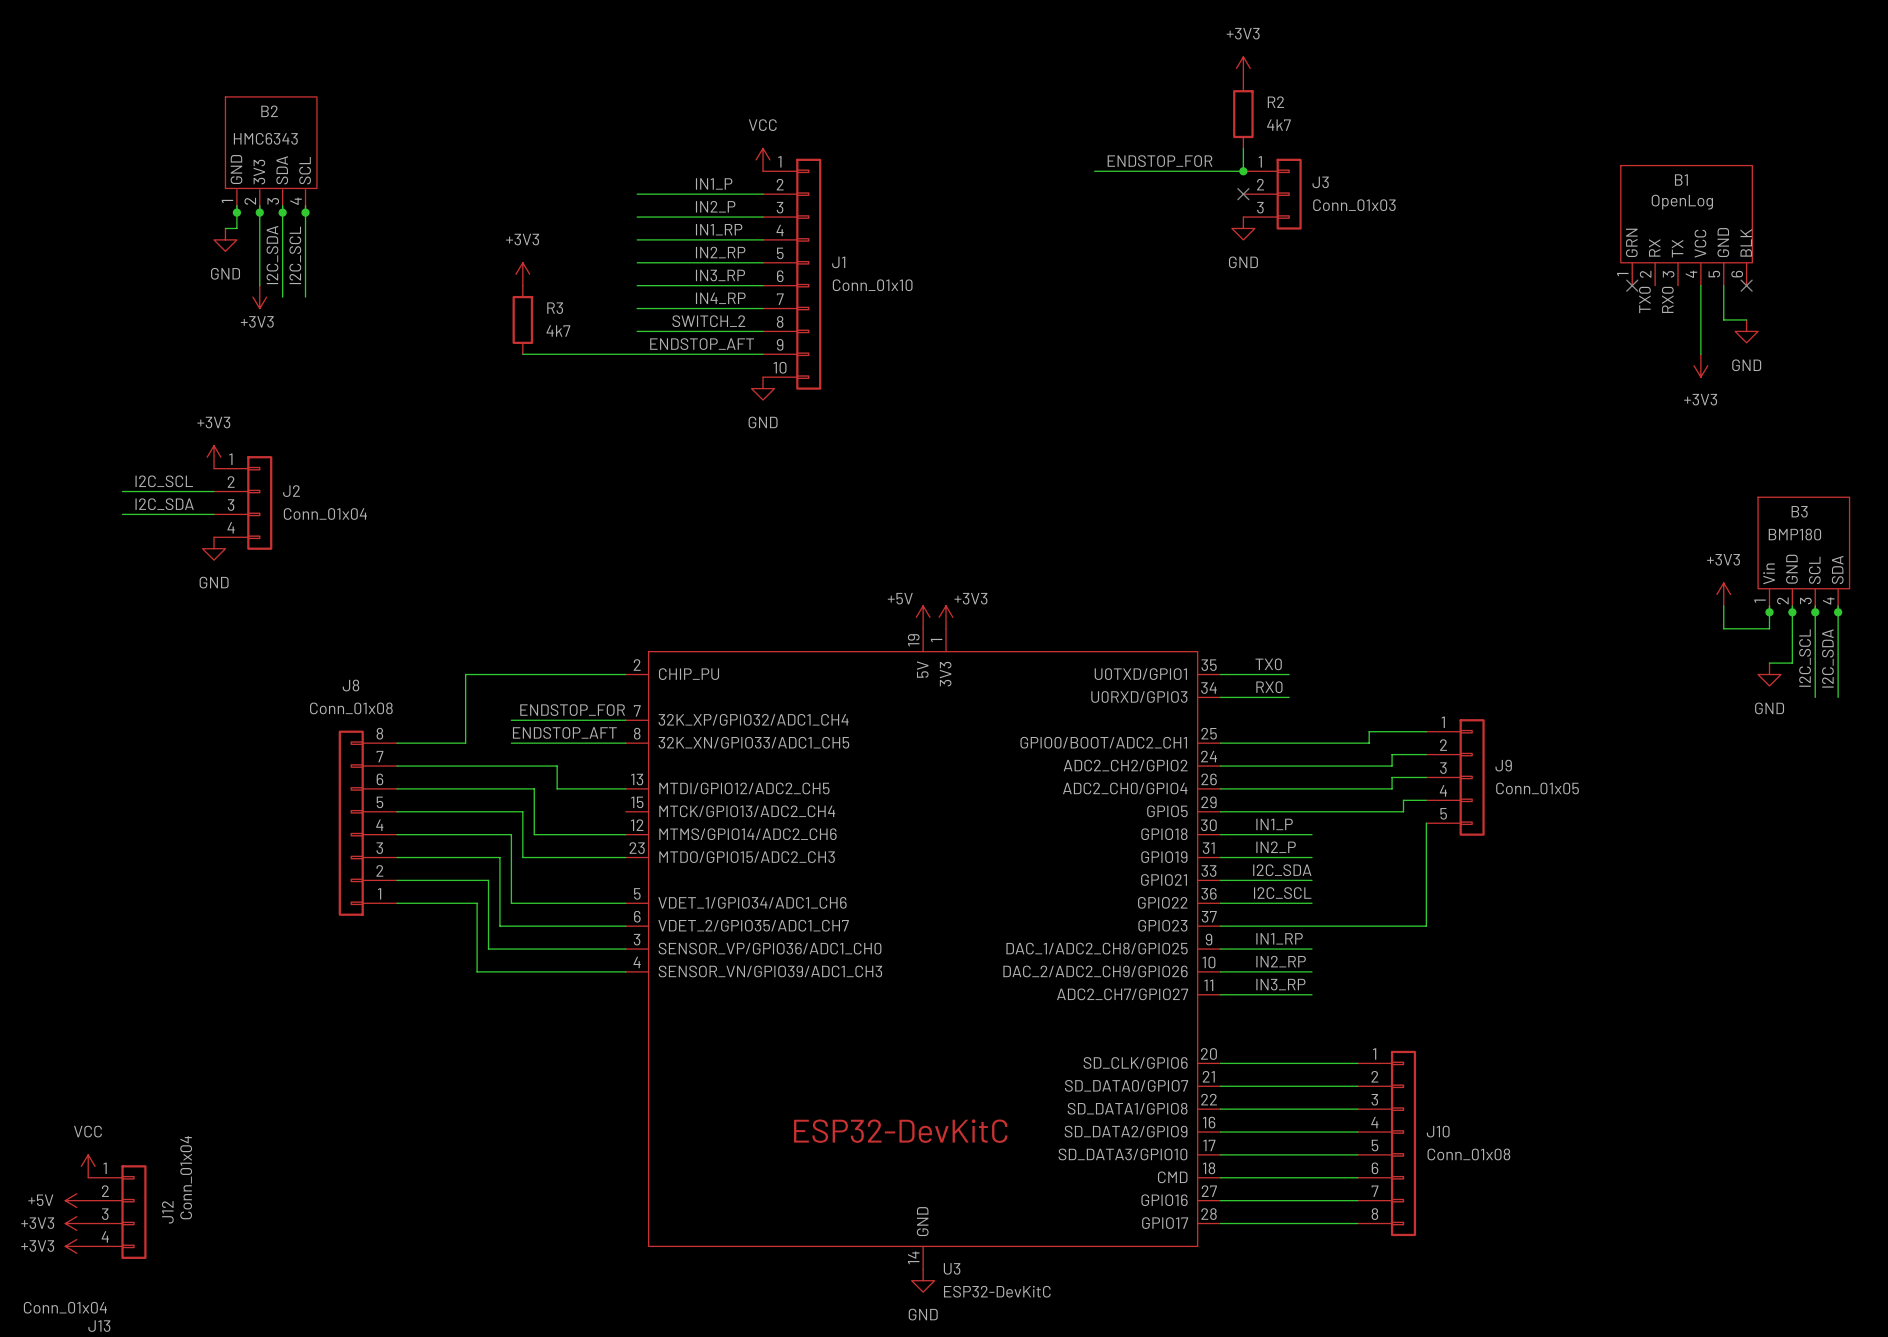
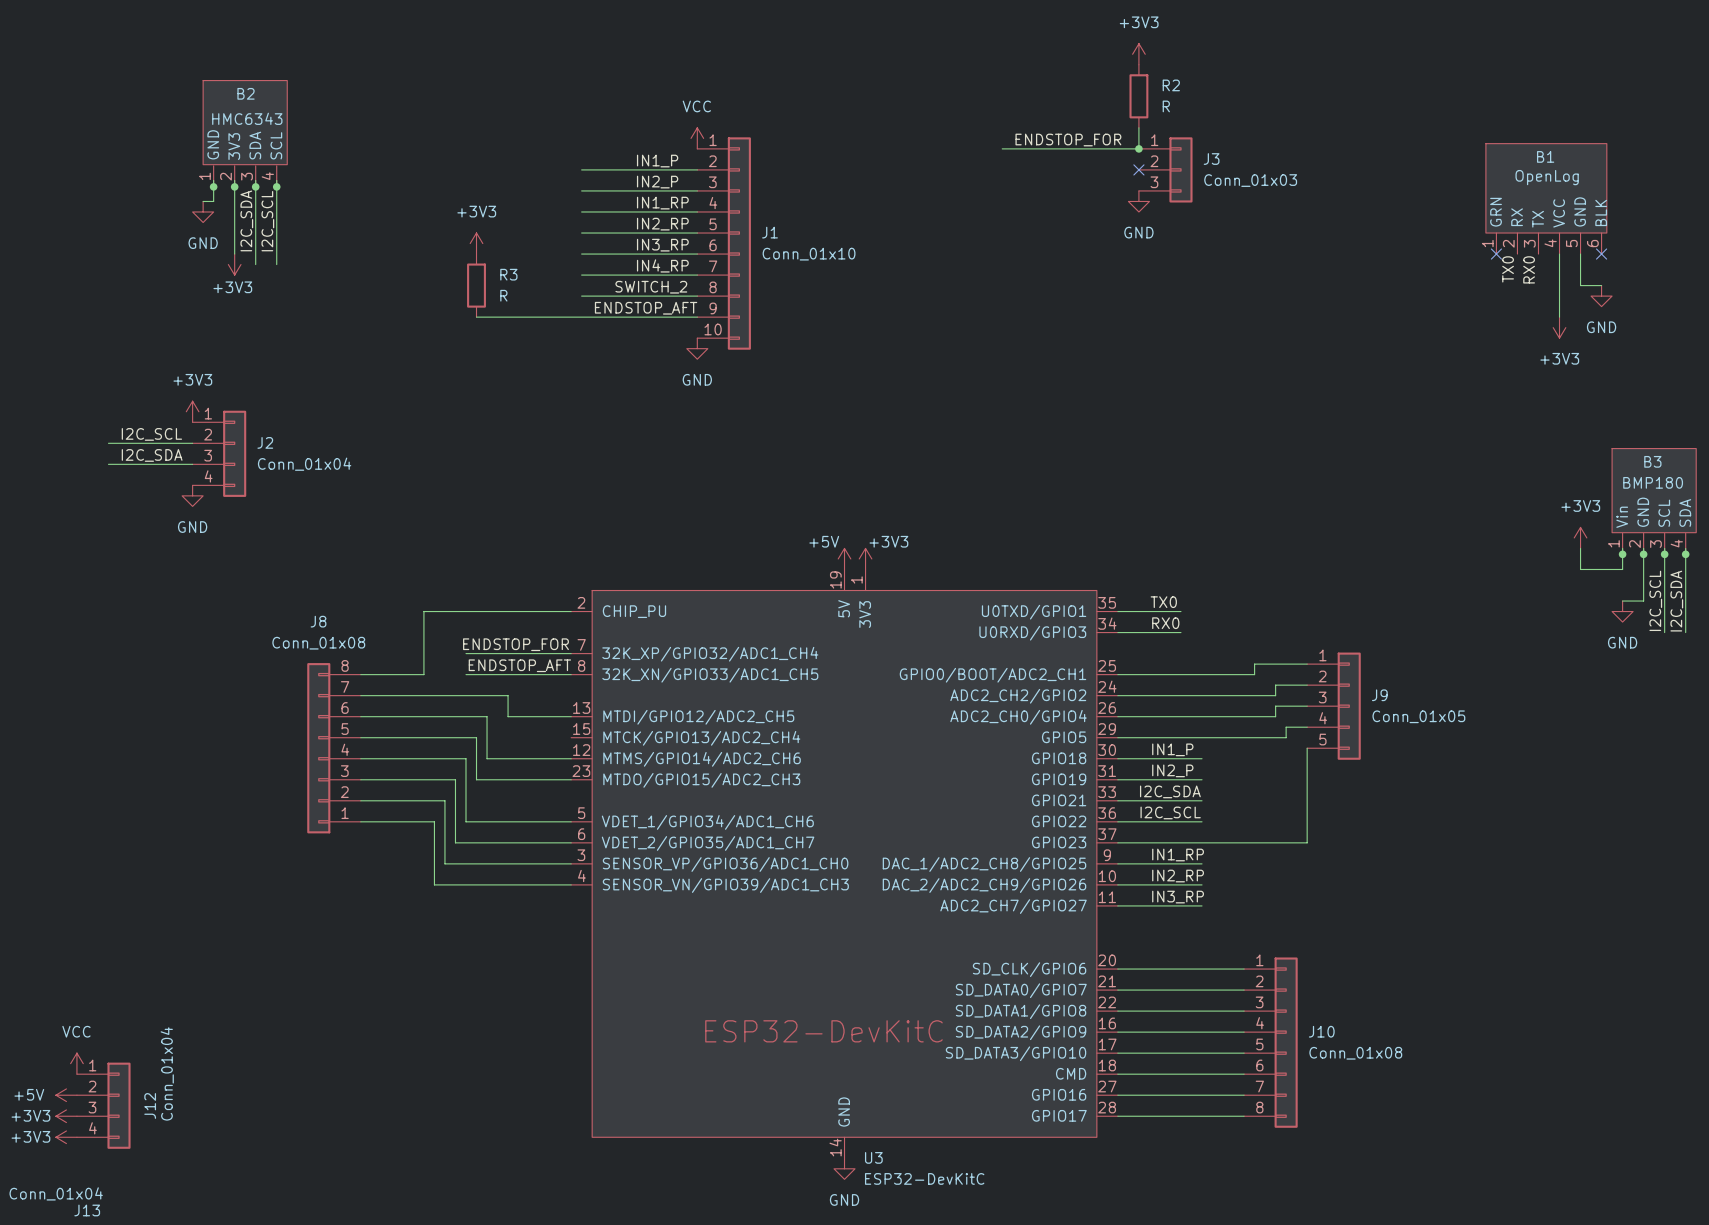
R2 value: 4k7 (1278, 125) -> R (1166, 106)
R3 value: 4k7 (558, 330) -> R (503, 295)

